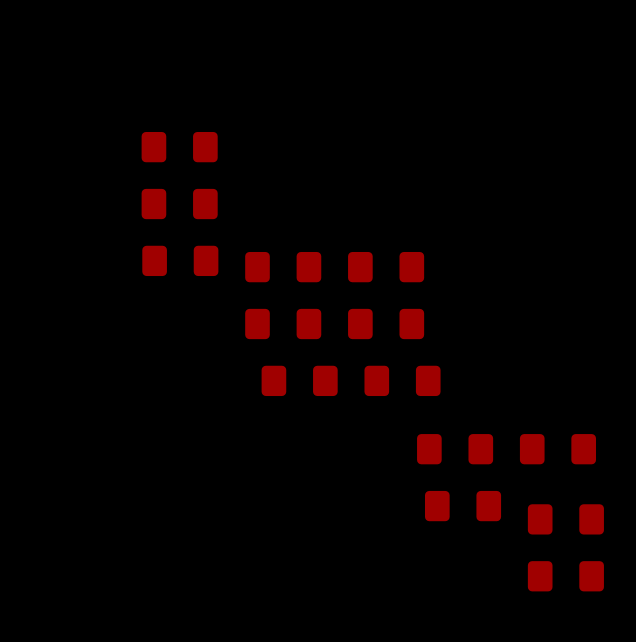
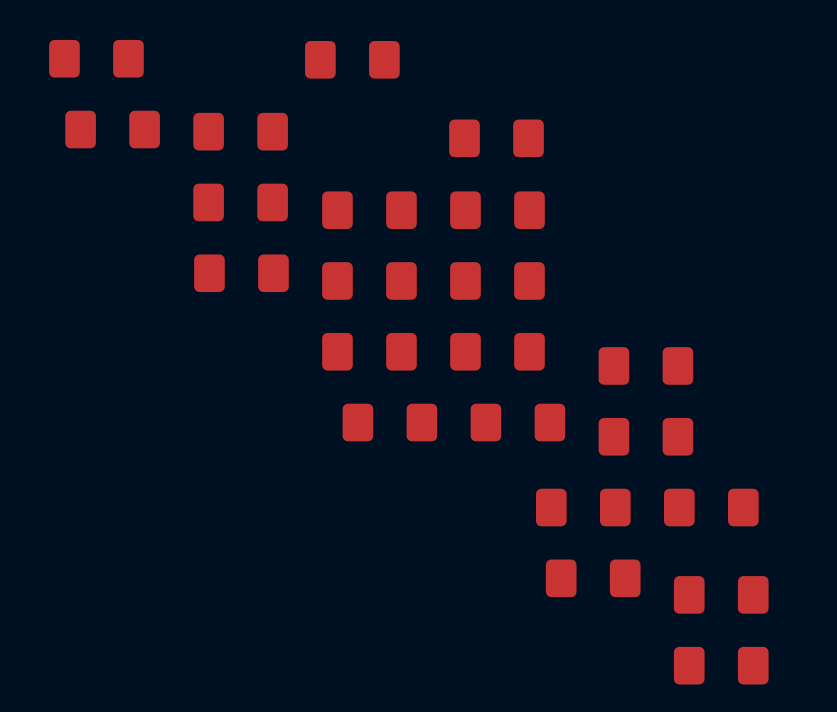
part: none -> (96, 58)
part: none -> (352, 59)
part: none -> (112, 129)
part: none -> (496, 138)
part: none -> (369, 210)
part: none -> (497, 210)
part: none -> (645, 365)
part: none -> (645, 436)

